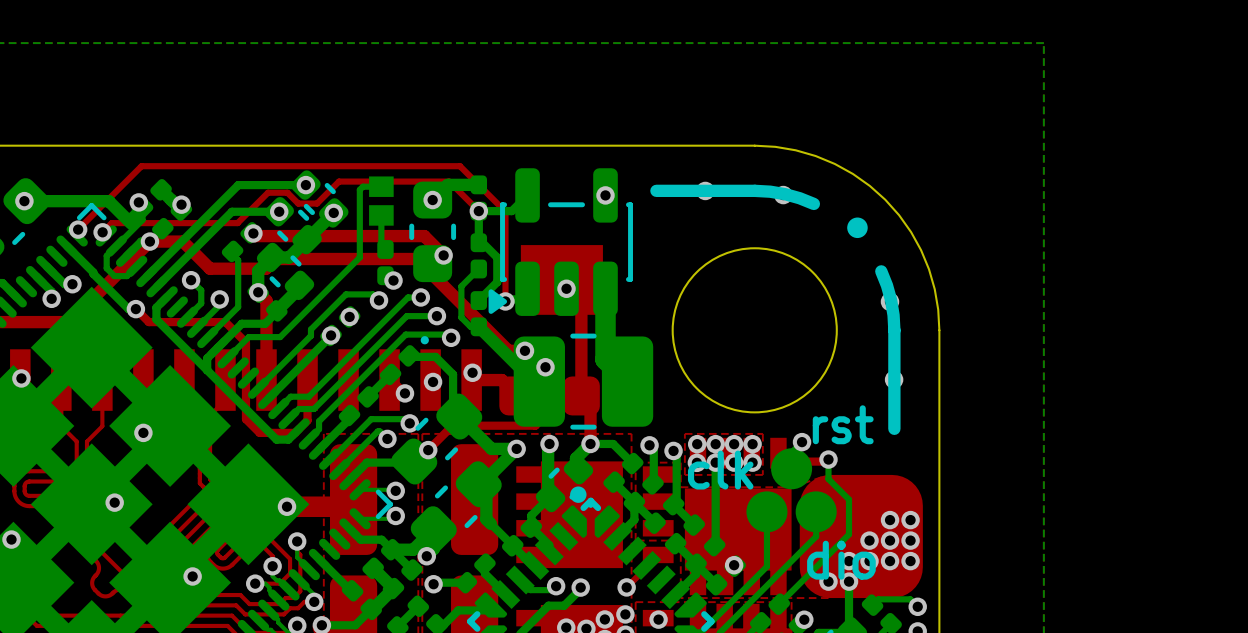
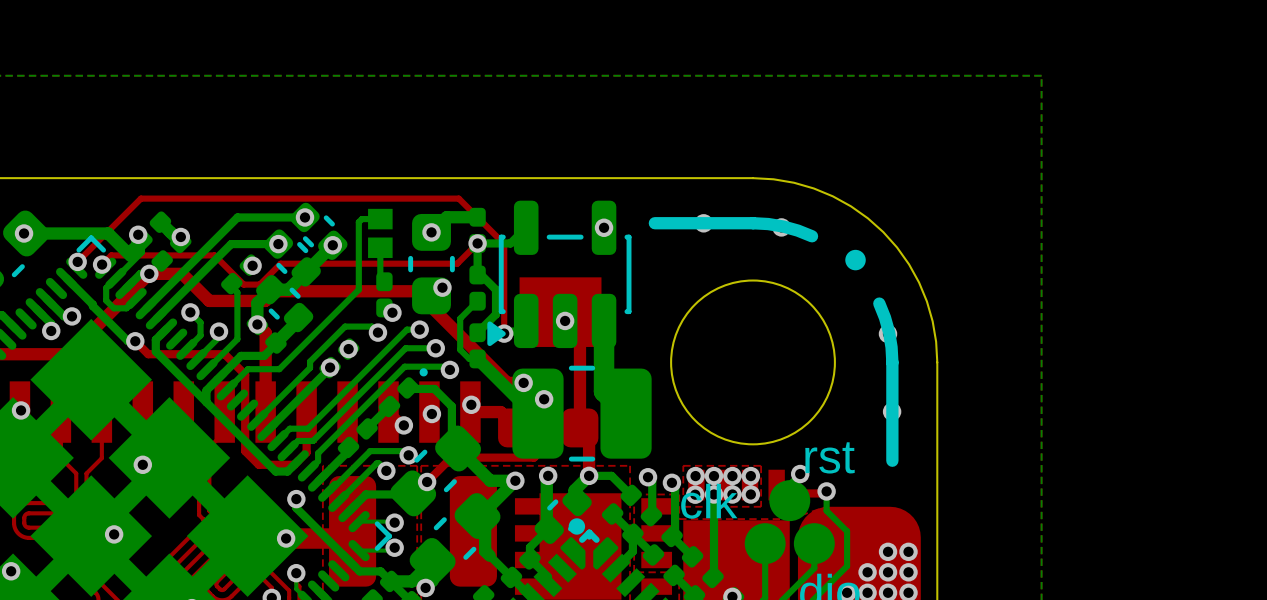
top track: (478, 211) (449, 181) (339, 181) (317, 203) (298, 203) (287, 192) (268, 192) (237, 223) (215, 223) -> (477, 243) (457, 263) (280, 263) (259, 284) (243, 284) (214, 255)
top track: (253, 233) (256, 236) (424, 236) (443, 255) -> none
bottom track: none -> (296, 499) (296, 508) (348, 560)
via: none -> (296, 499)

